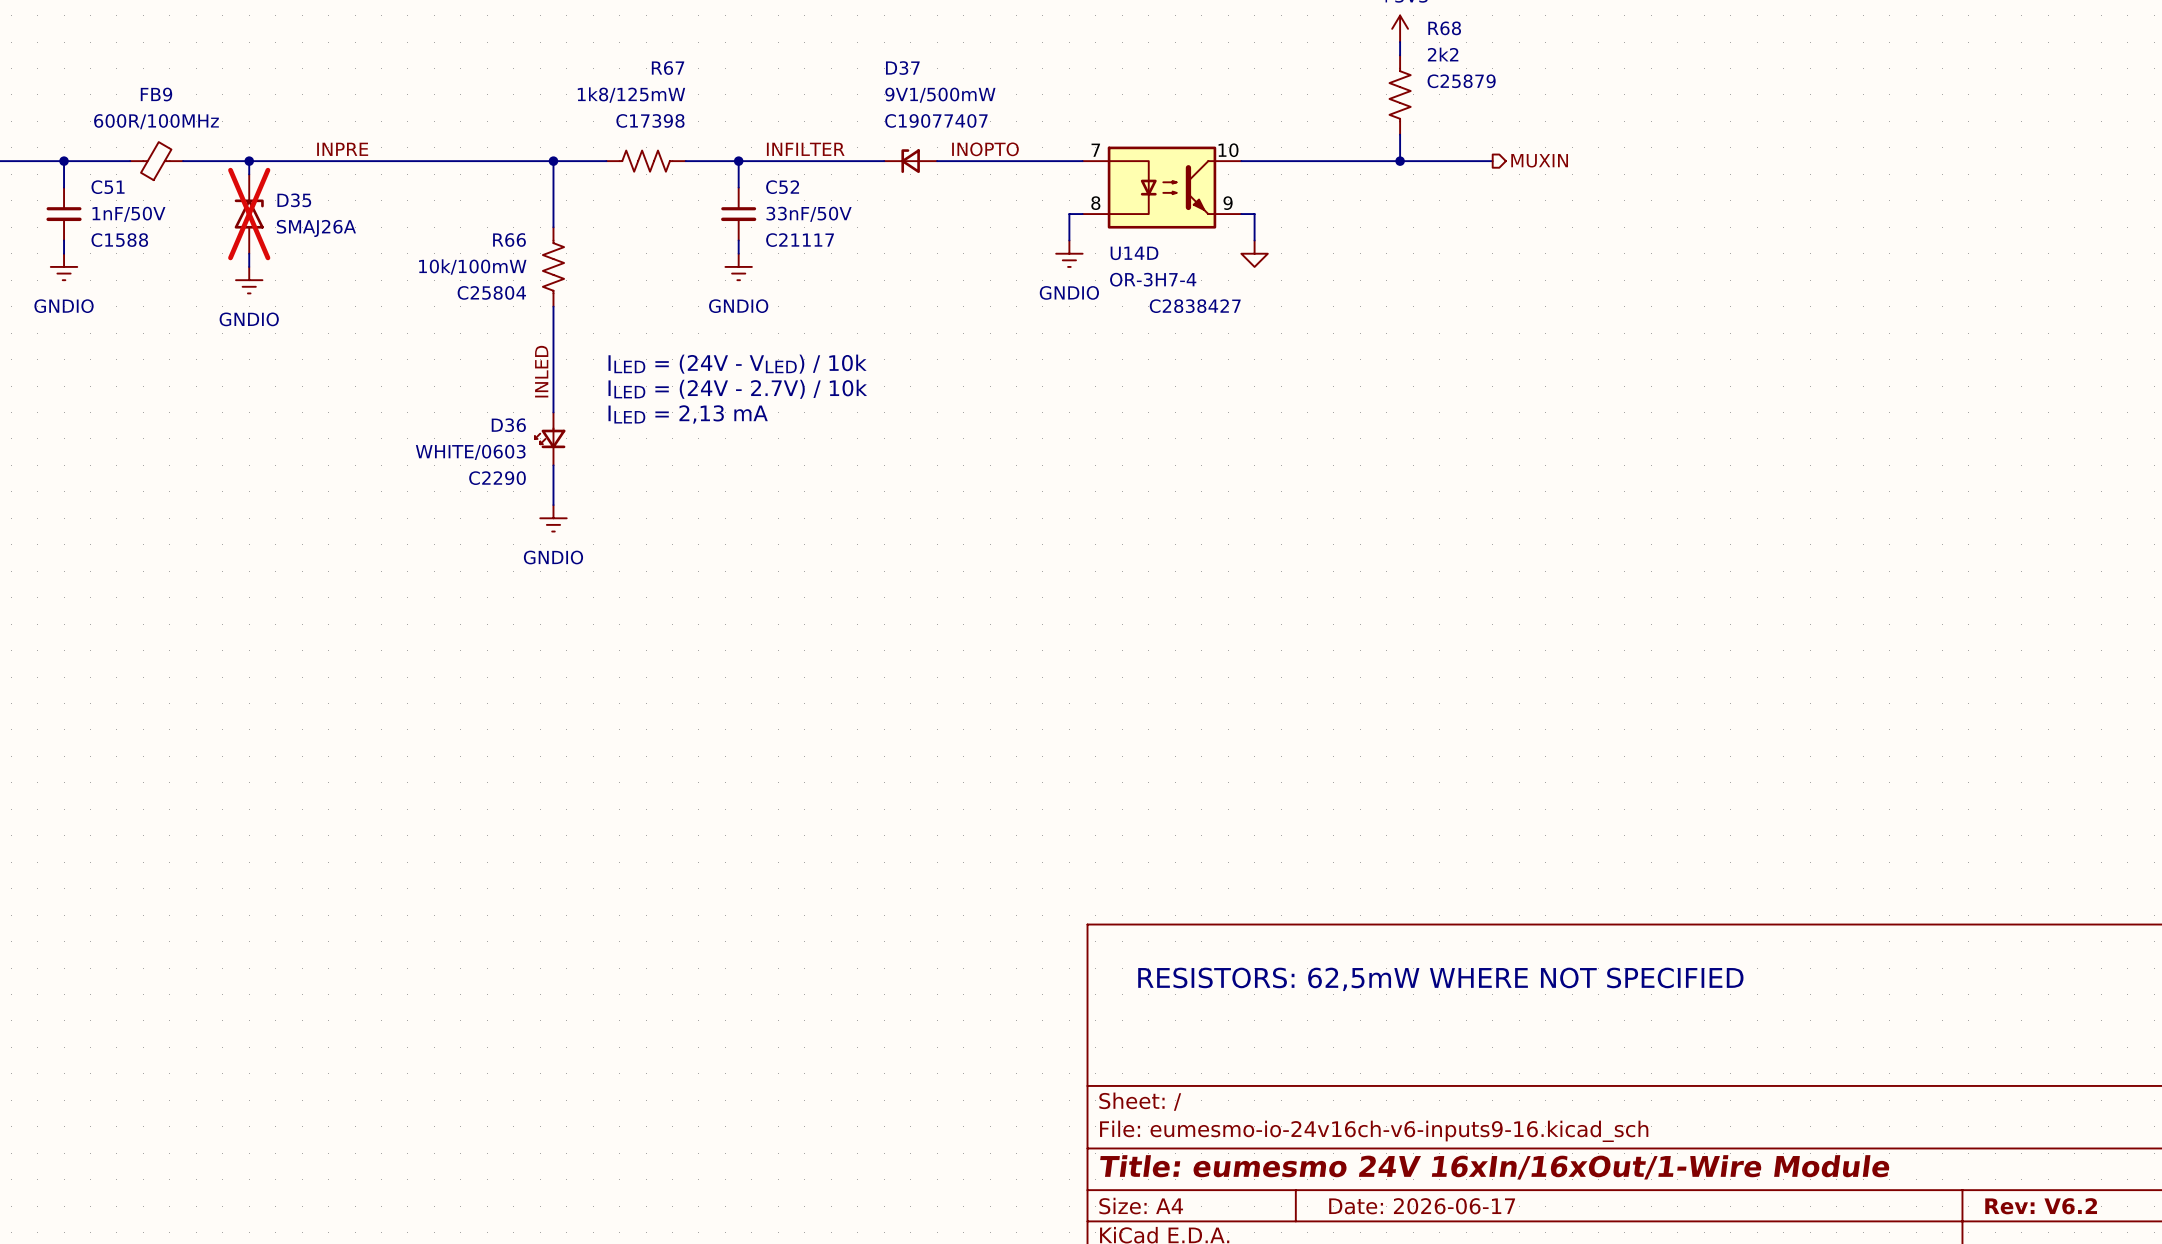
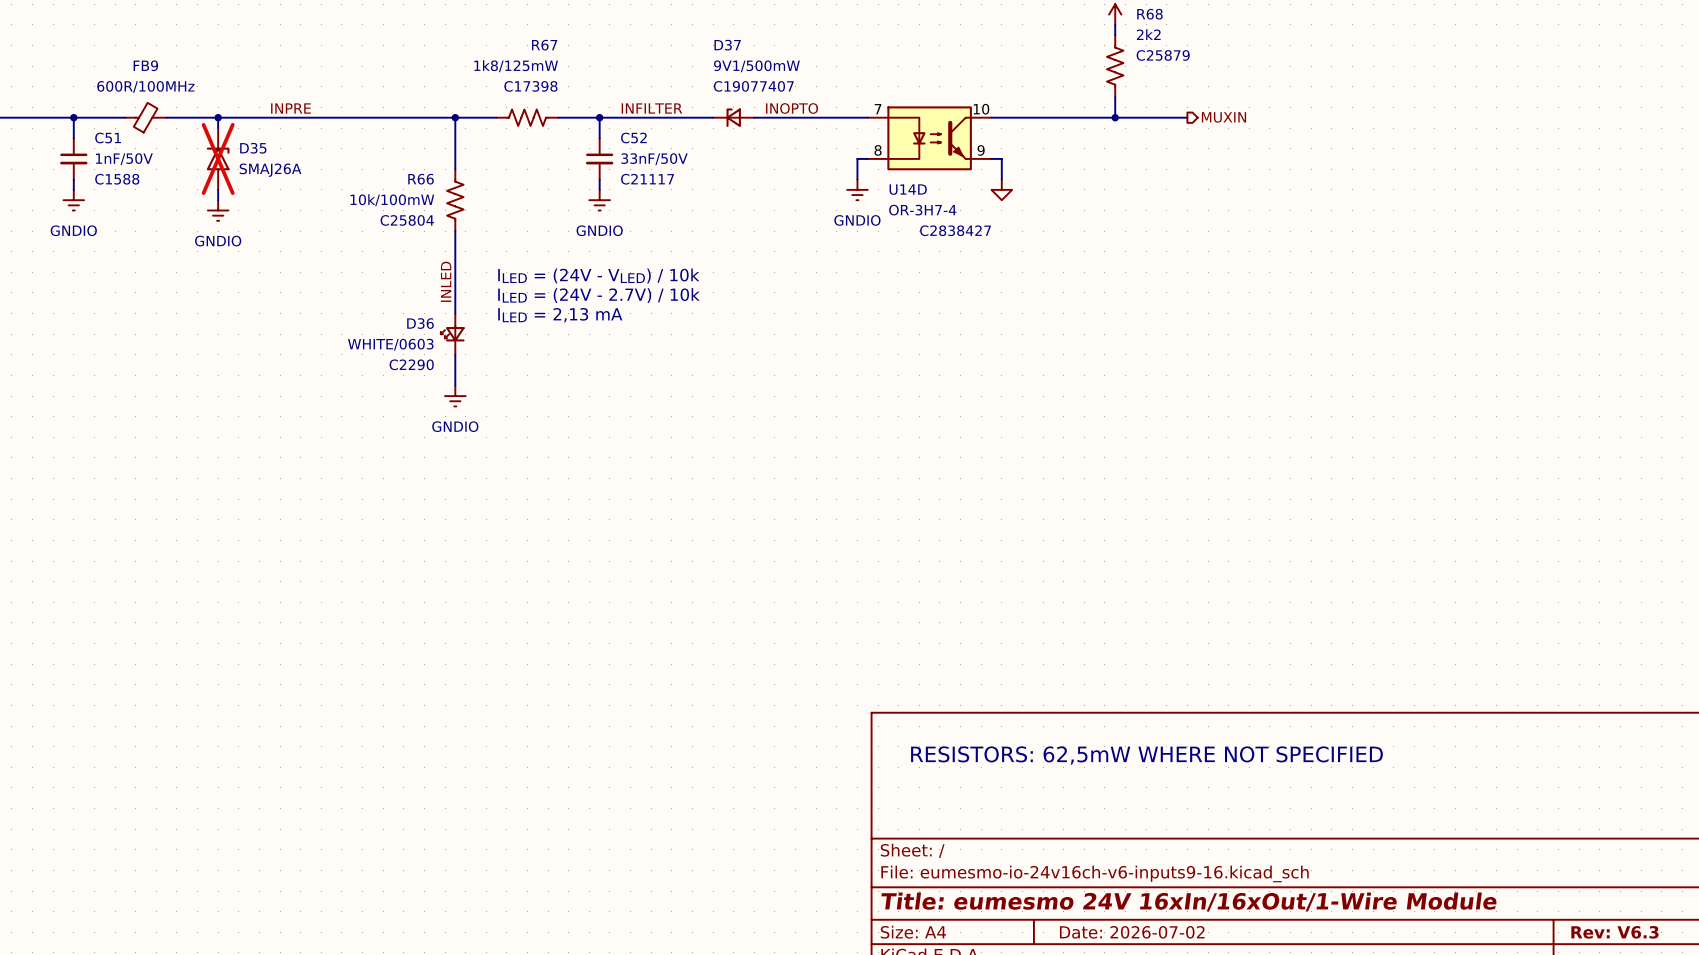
title block: Date: 2026-06-17 (1422, 1206) -> Date: 2026-07-02 (1132, 932)
title block: Rev: V6.2 (2041, 1206) -> Rev: V6.3 (1614, 932)

